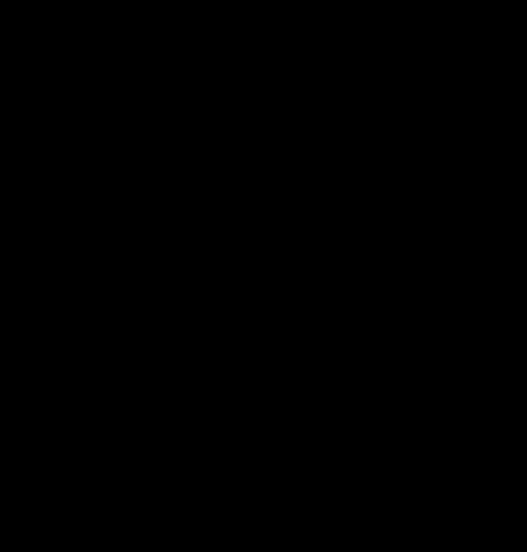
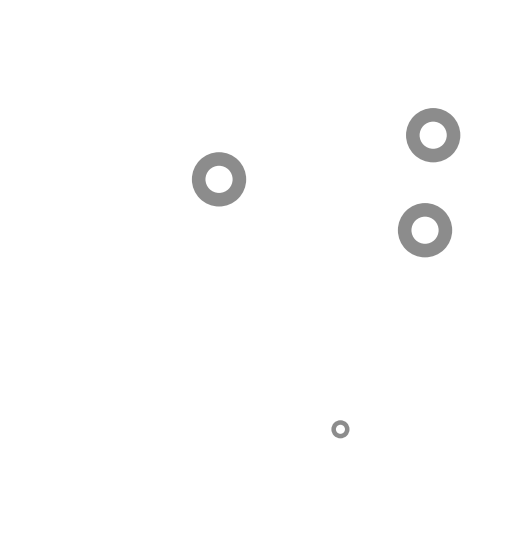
part: none -> (433, 135)
part: none -> (219, 179)
part: none -> (425, 230)
via: none -> (340, 429)

